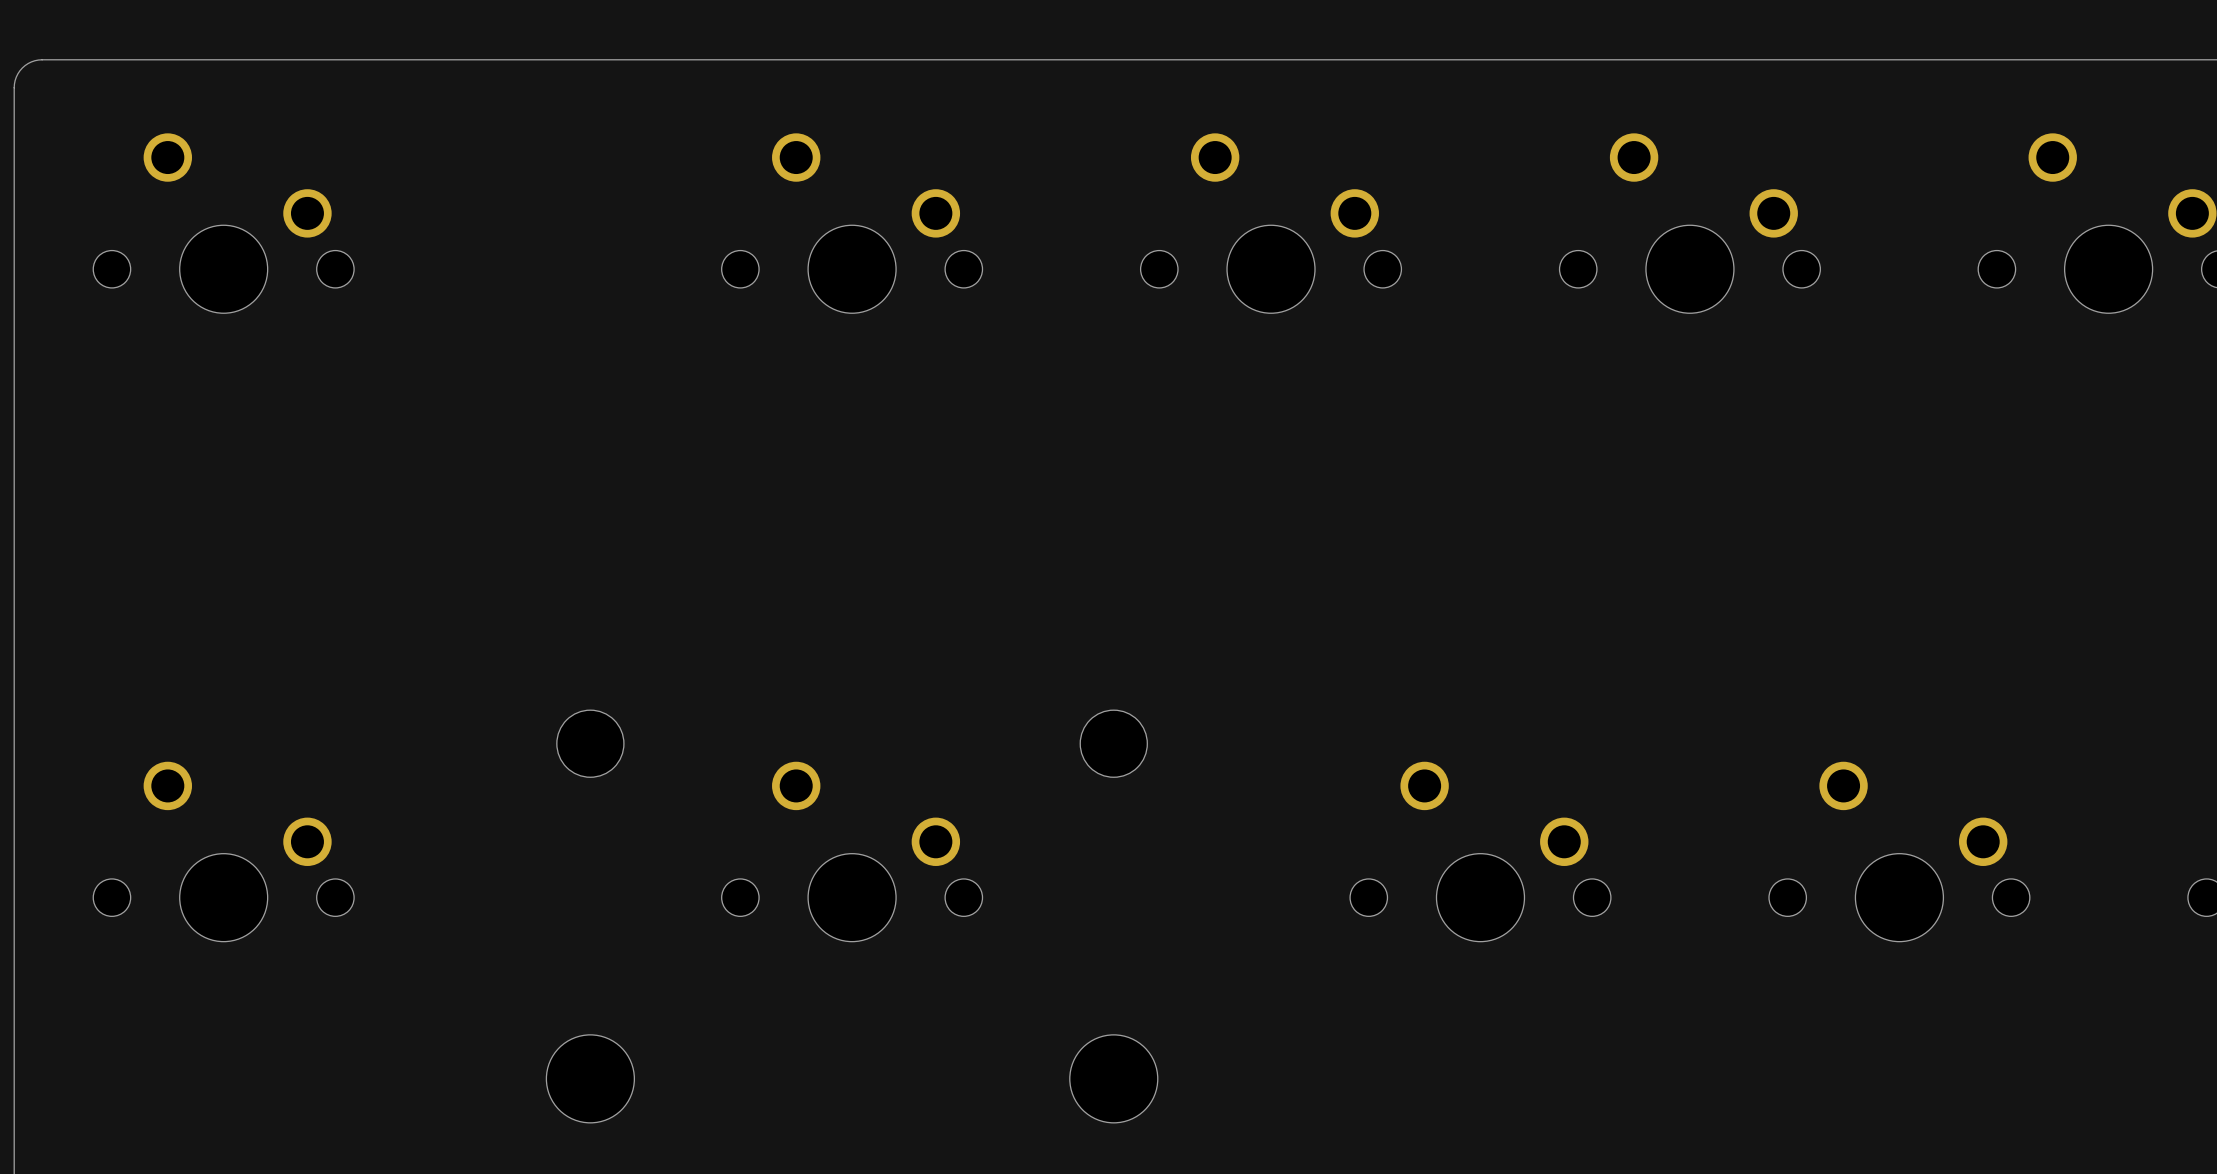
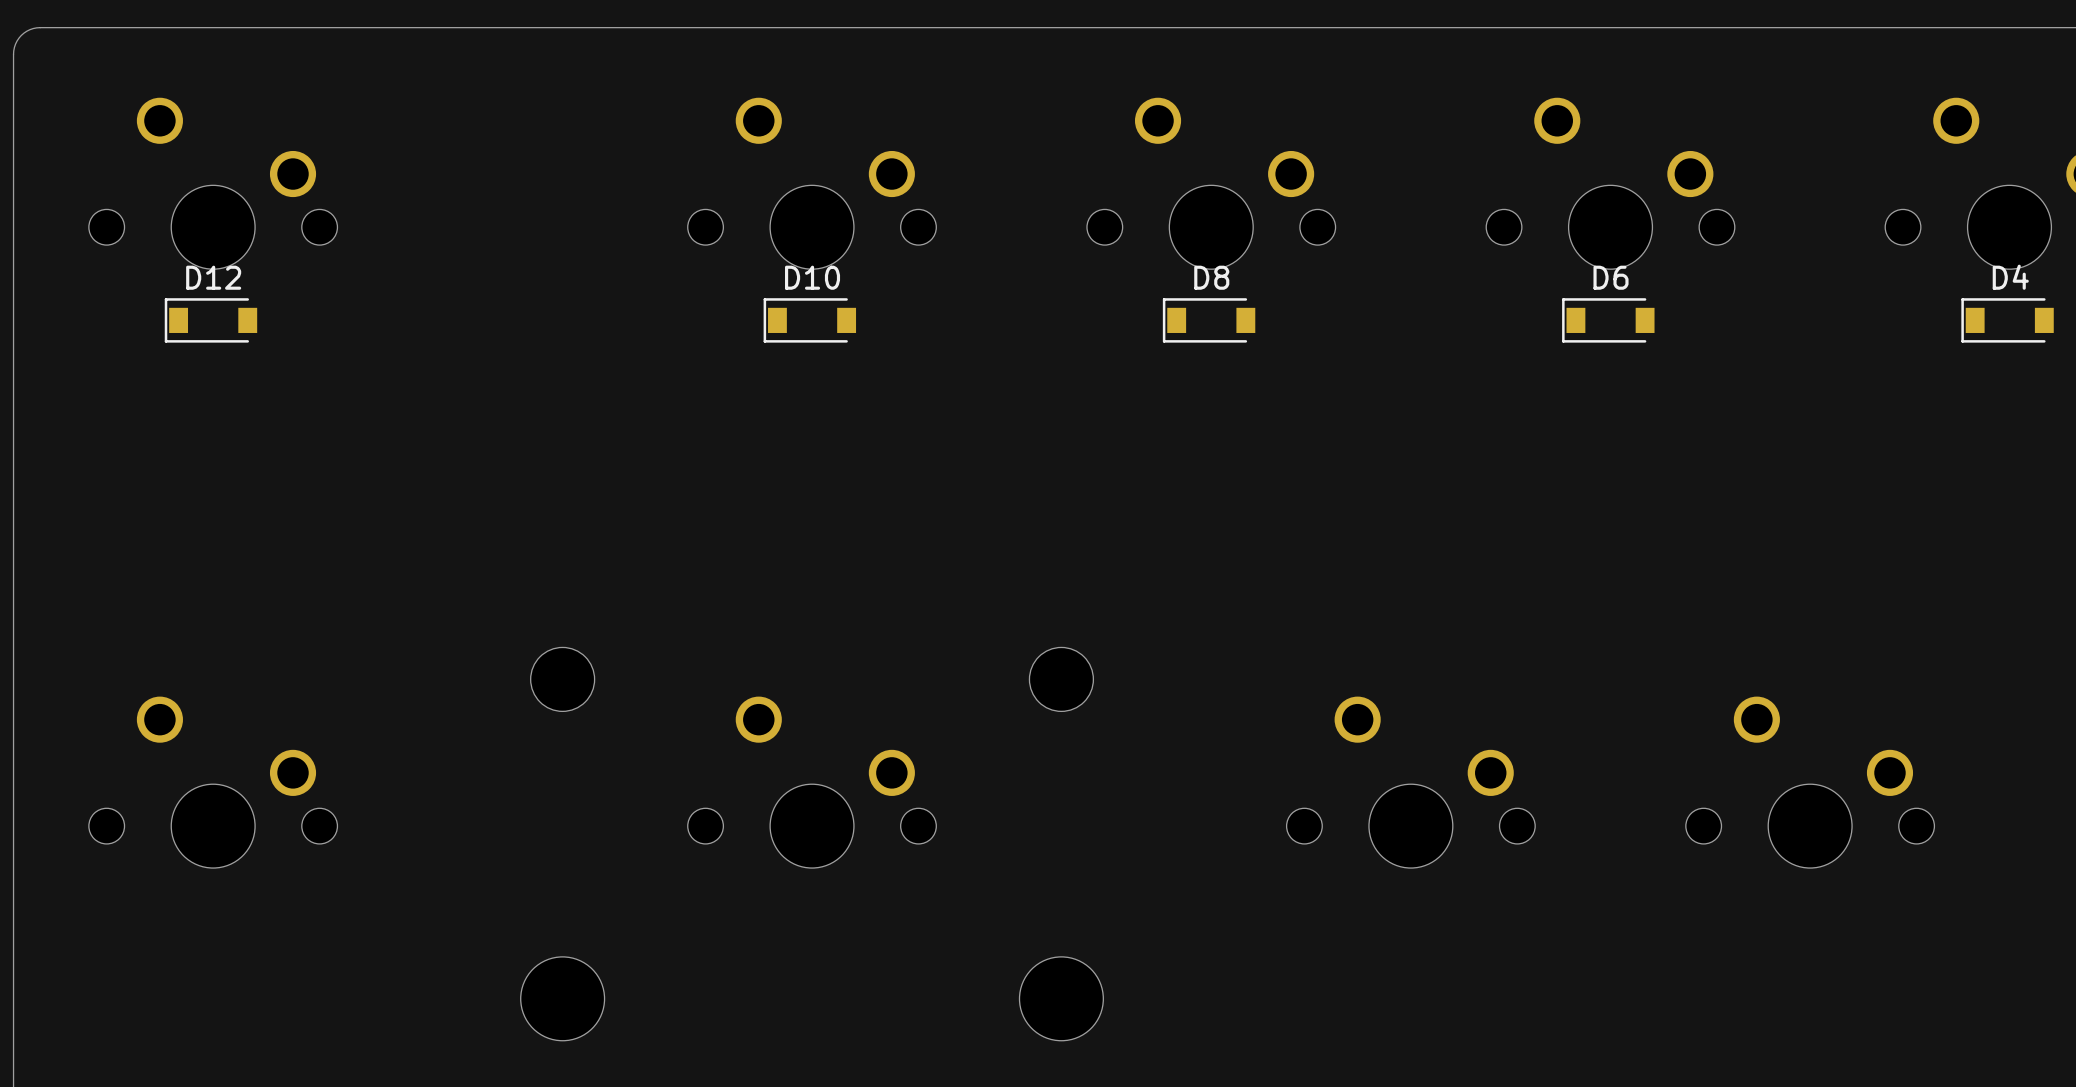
D12: none -> (210, 320)
D10: none -> (809, 320)
D8: none -> (1209, 320)
D6: none -> (1608, 320)
D4: none -> (2007, 320)

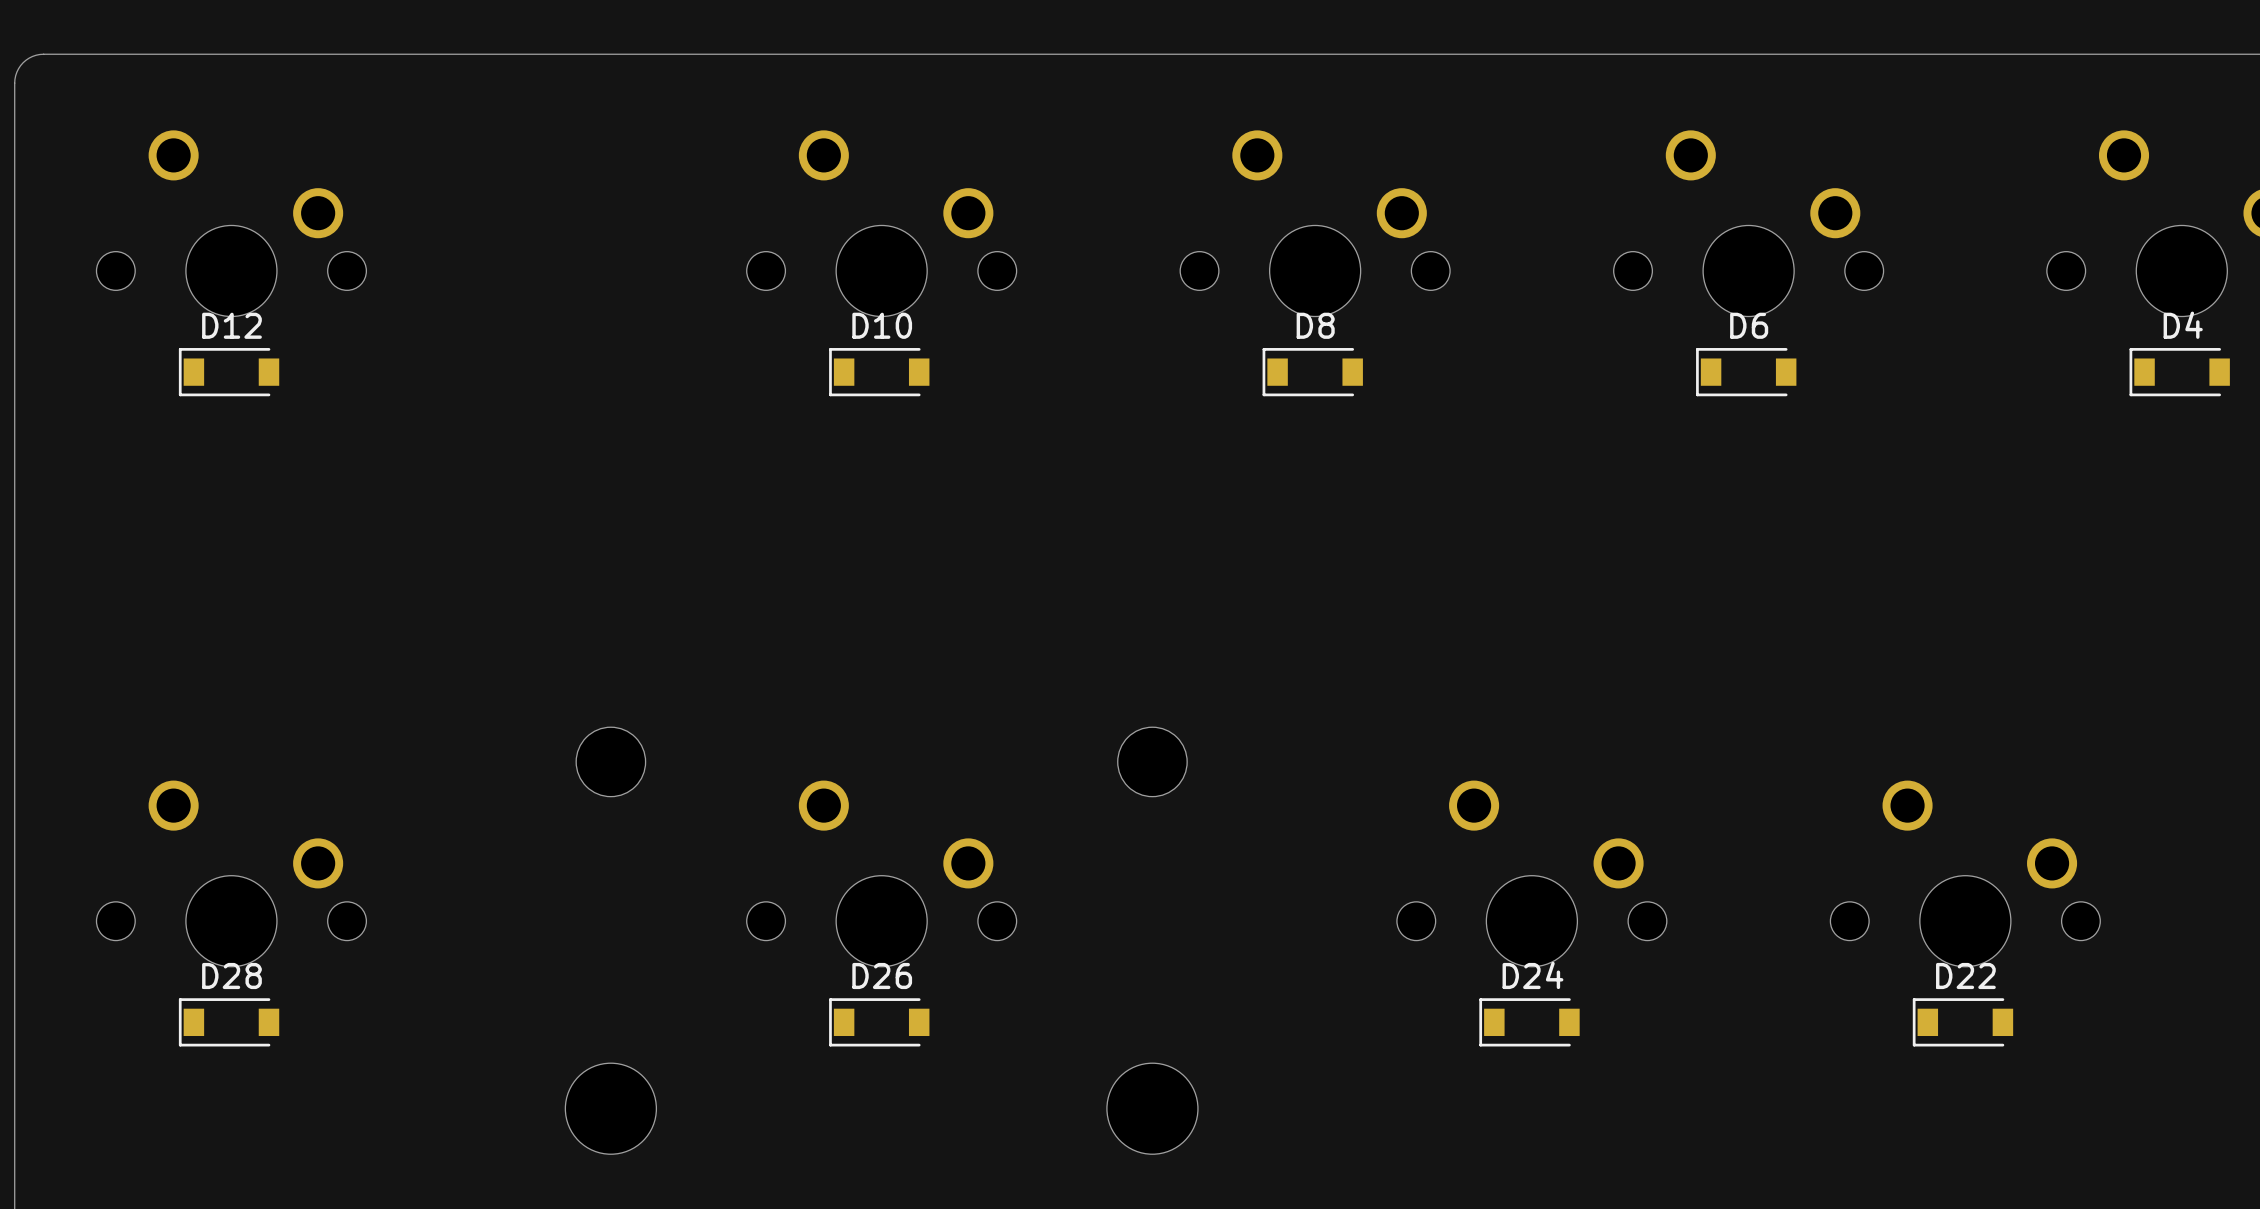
D28: none -> (229, 1022)
D26: none -> (879, 1022)
D24: none -> (1529, 1022)
D22: none -> (1962, 1022)

